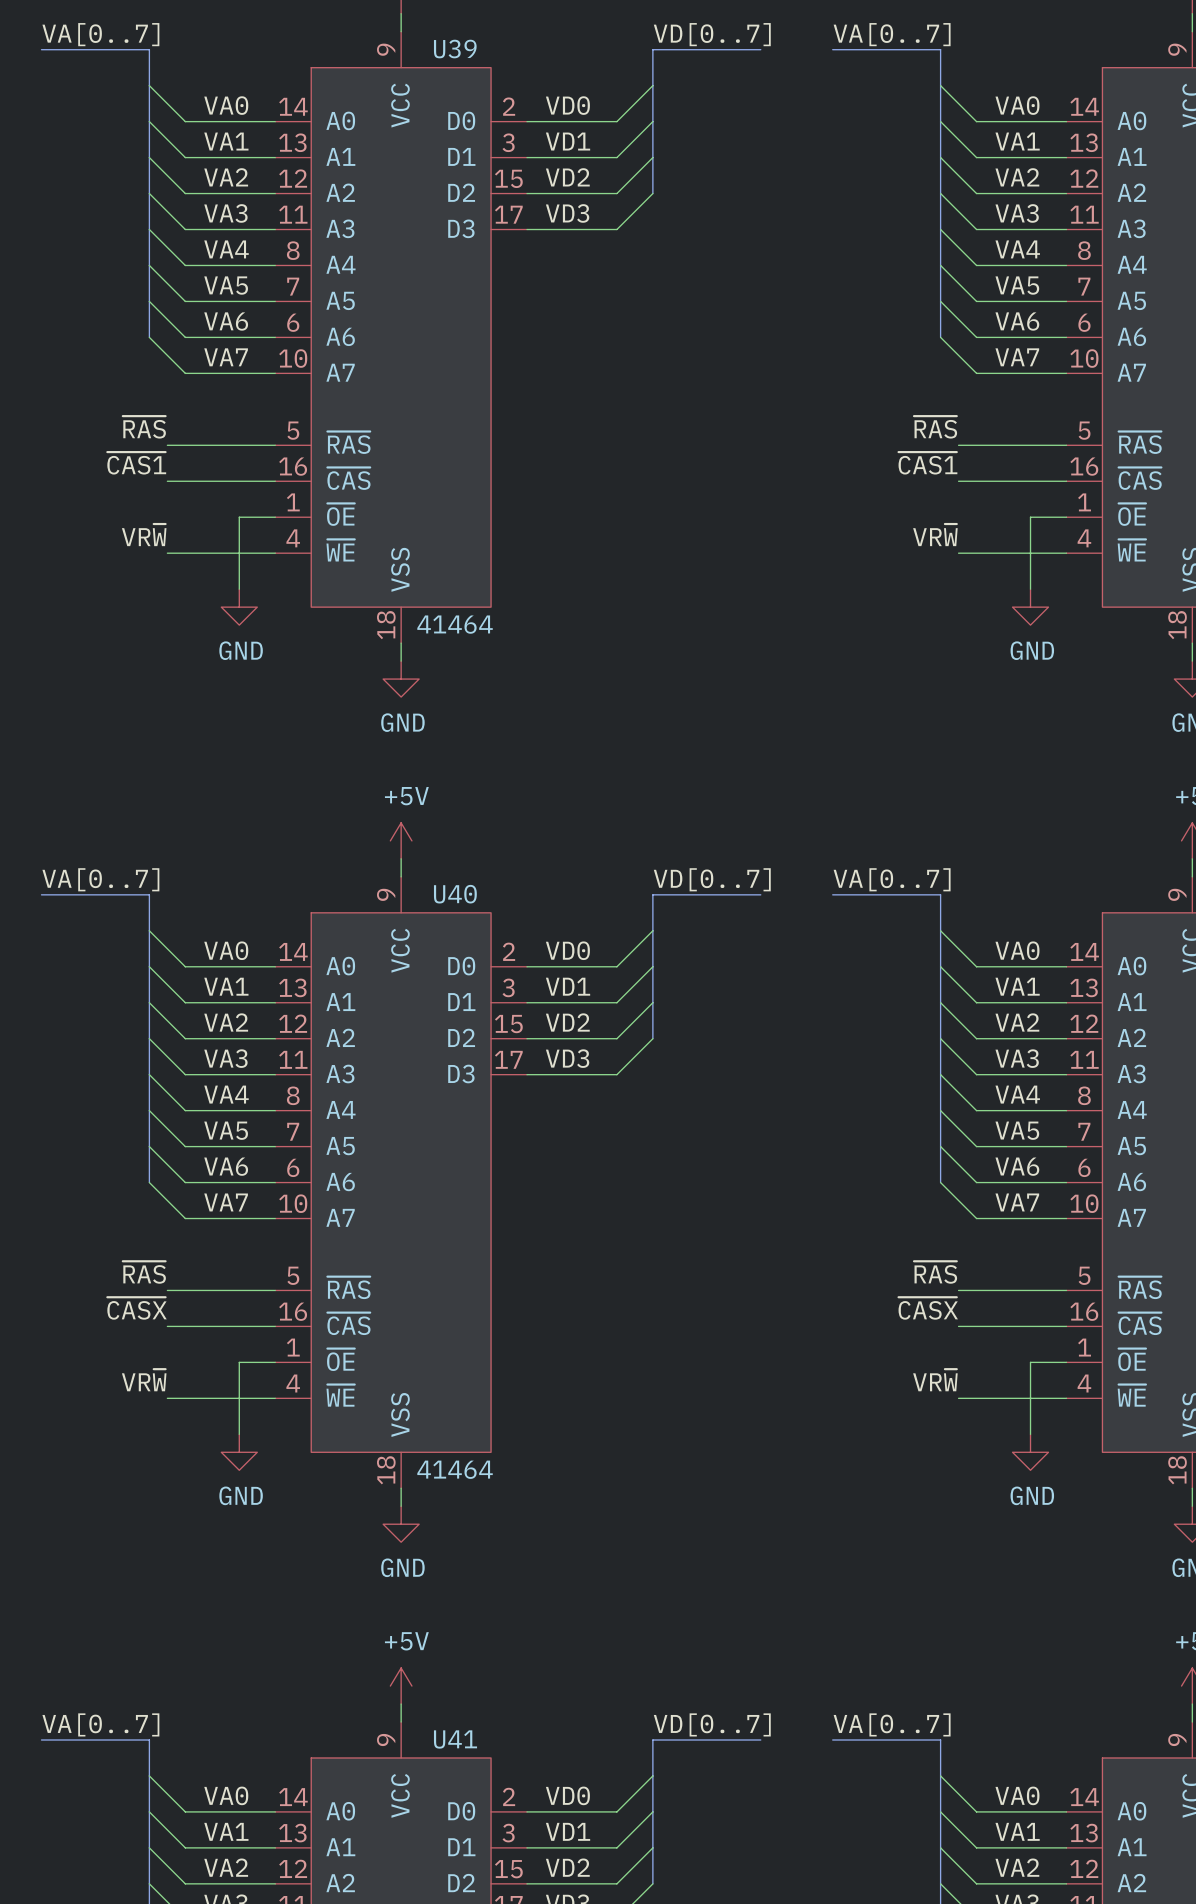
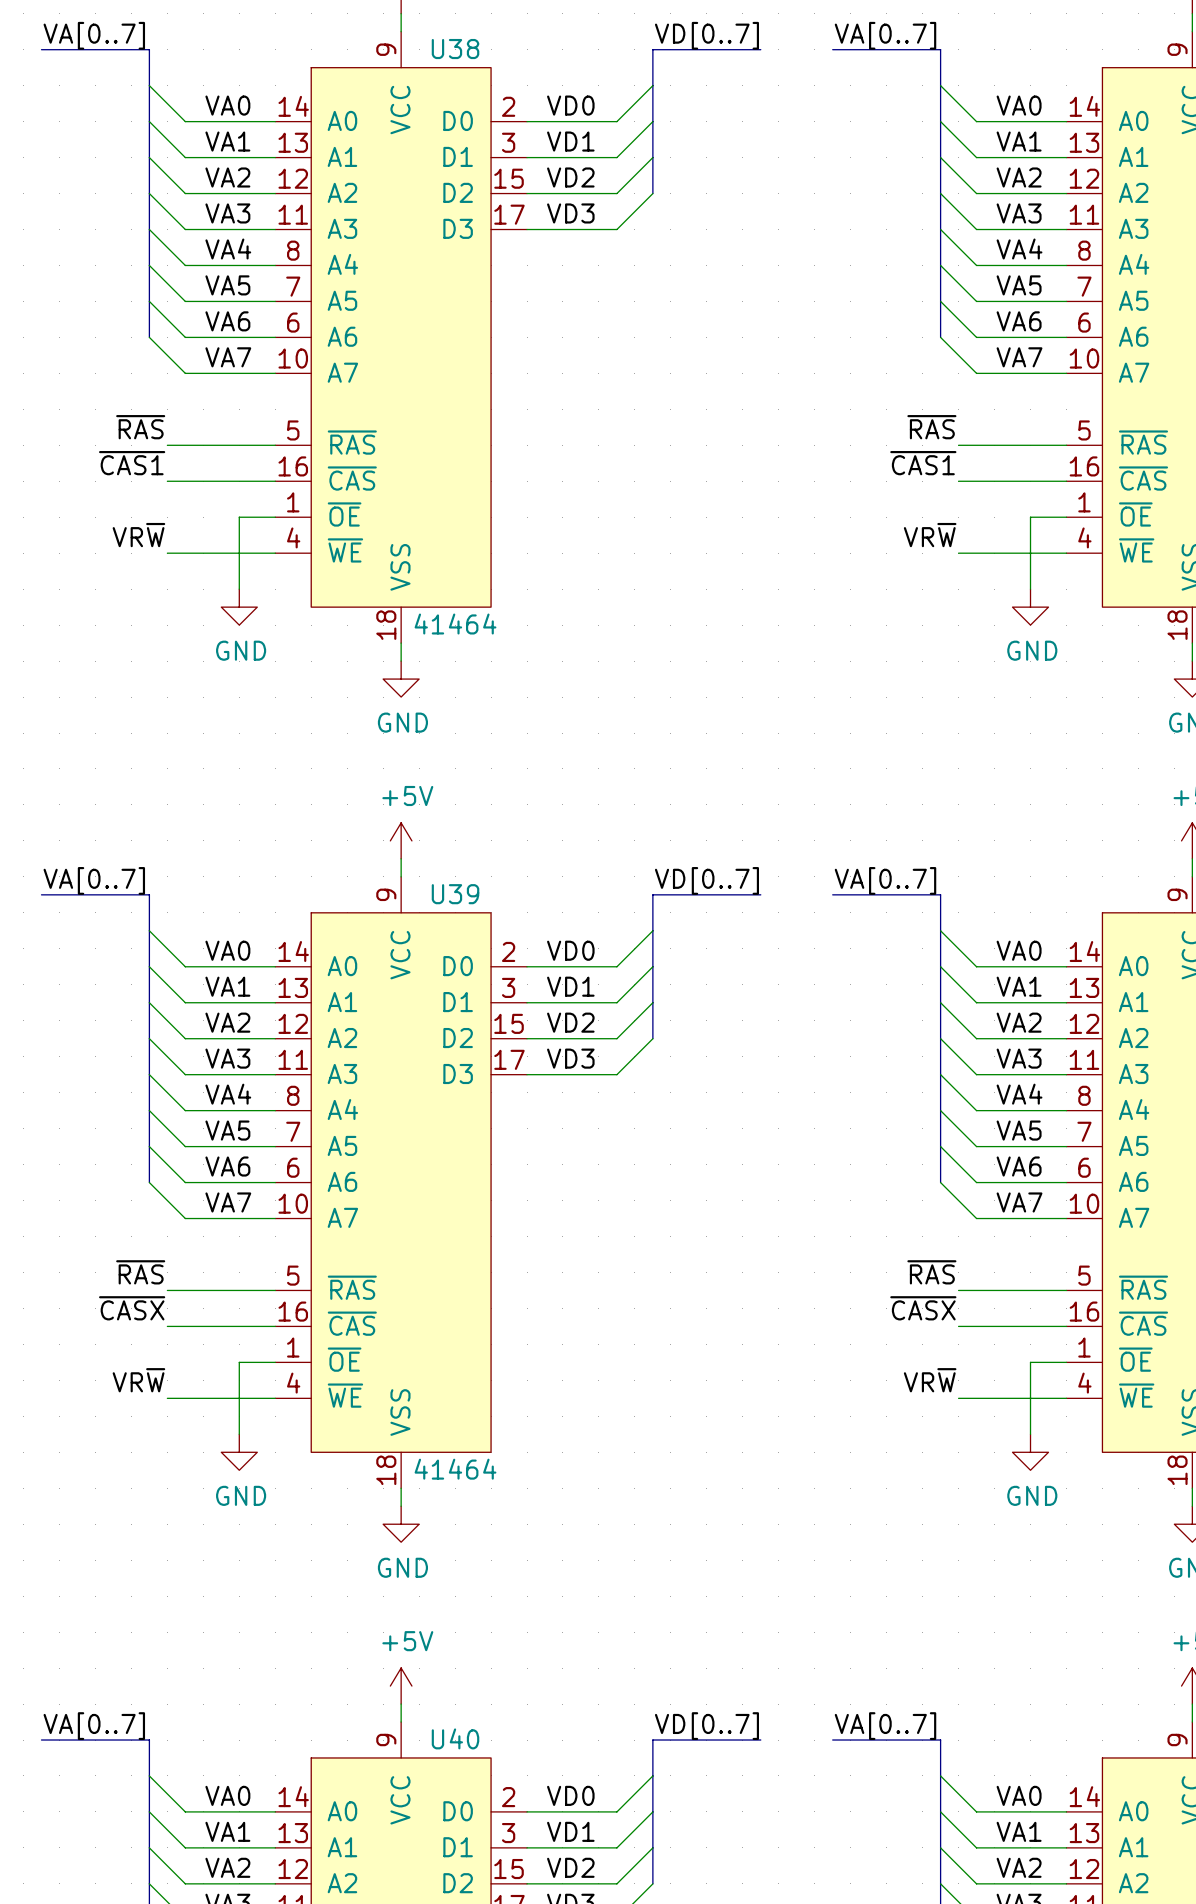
U39 name: U39 (455, 49) -> U38 (455, 49)
U40 name: U40 (455, 894) -> U39 (455, 894)
U41 name: U41 (455, 1739) -> U40 (455, 1738)

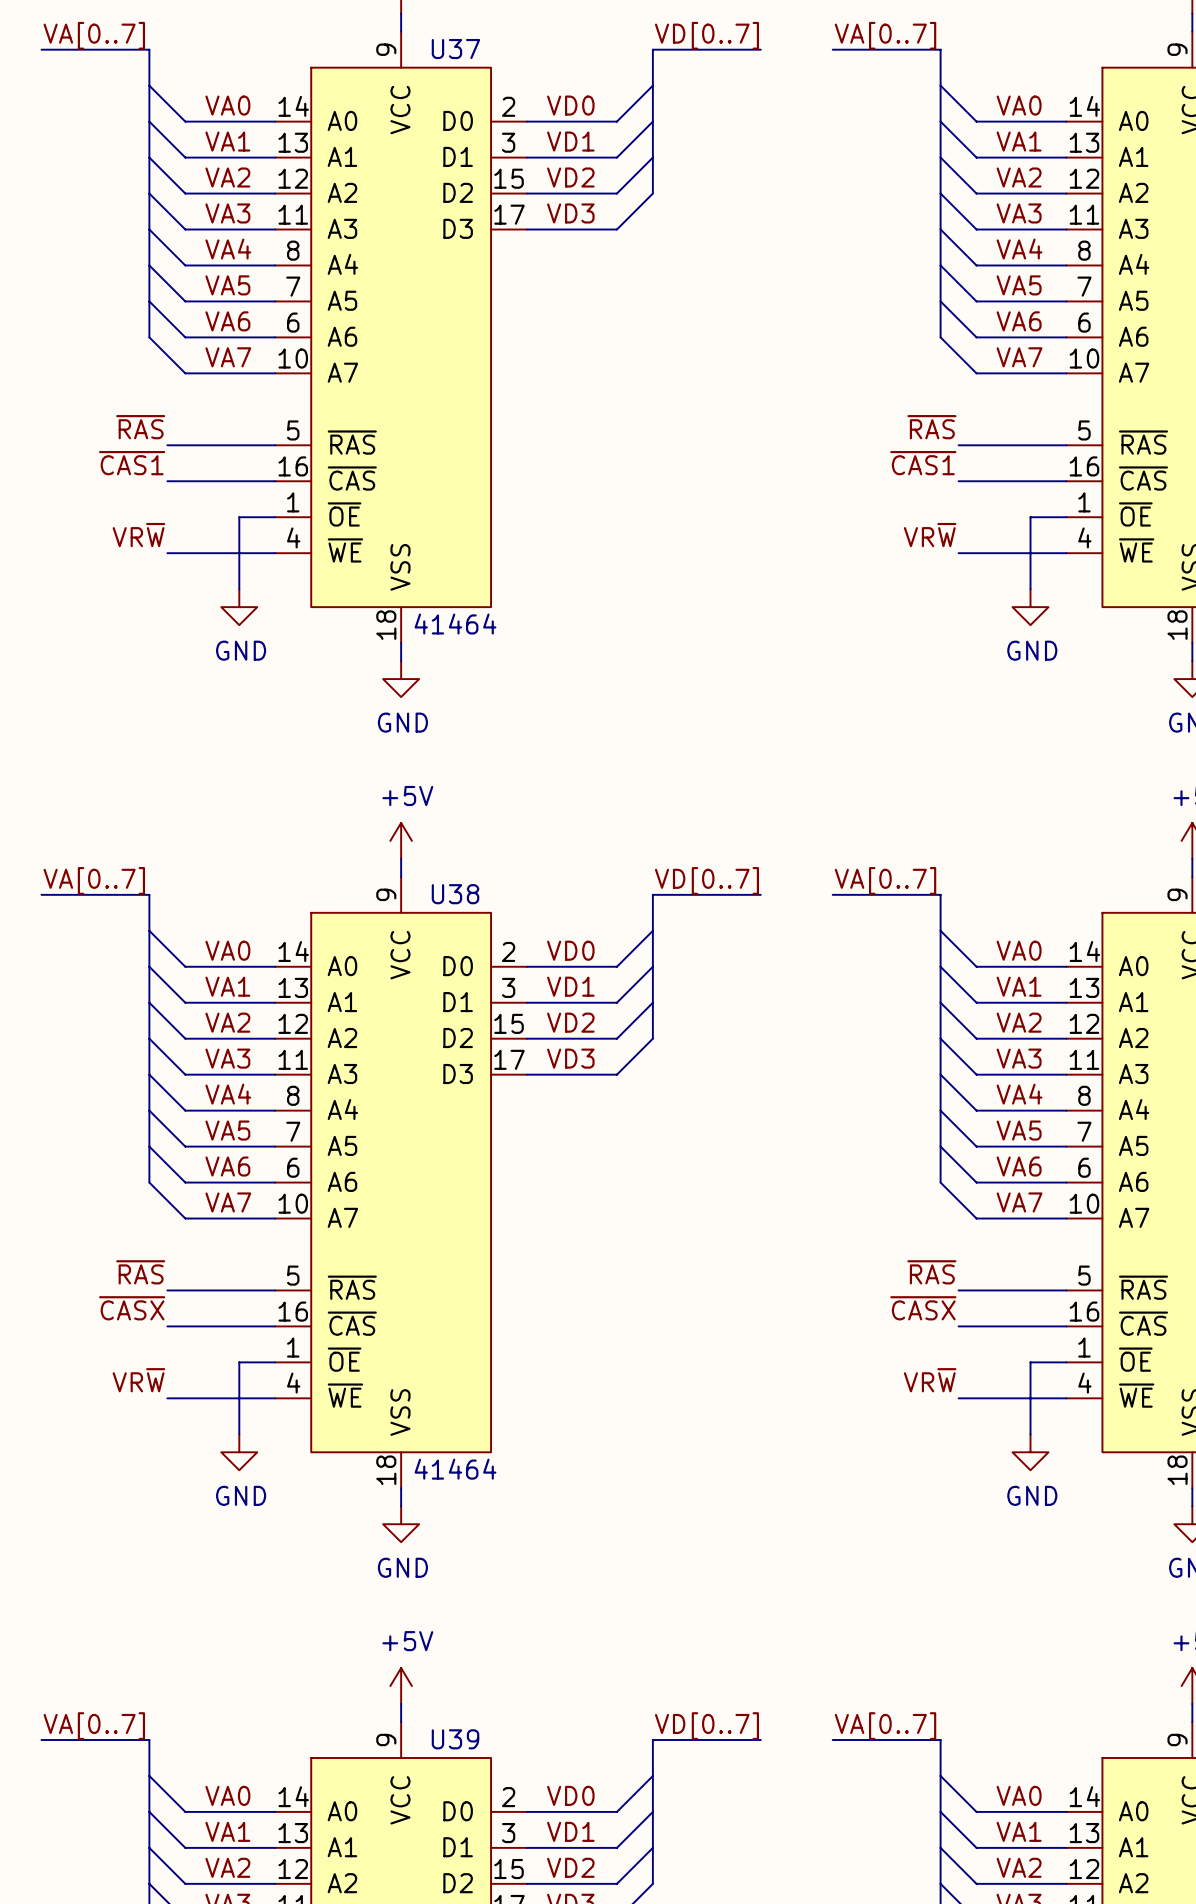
U38 name: U38 (455, 49) -> U37 (455, 49)
U39 name: U39 (455, 894) -> U38 (455, 894)
U40 name: U40 (455, 1738) -> U39 (455, 1739)

